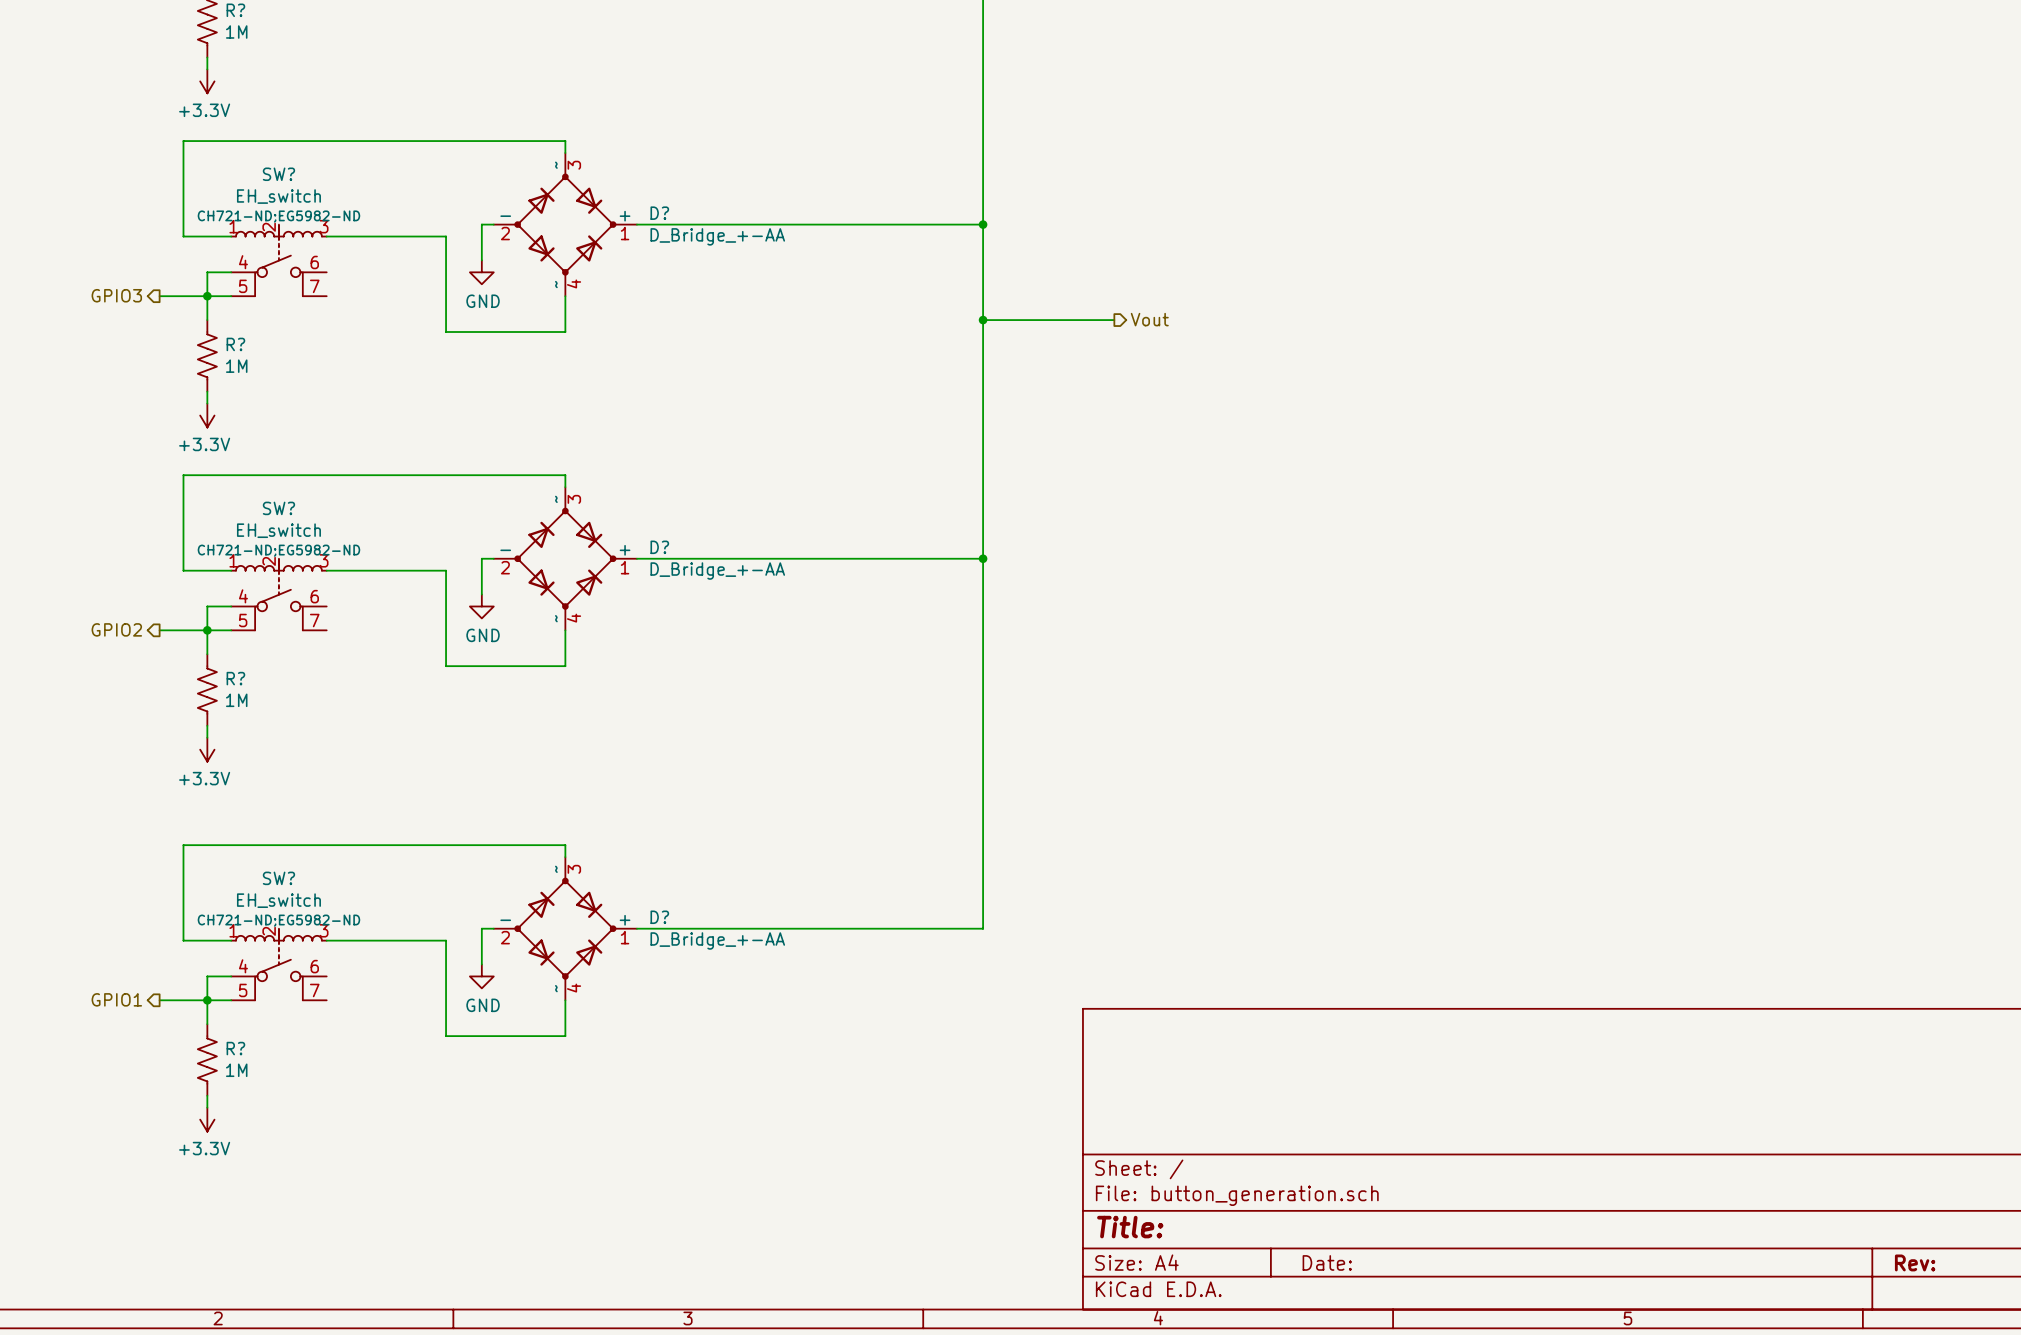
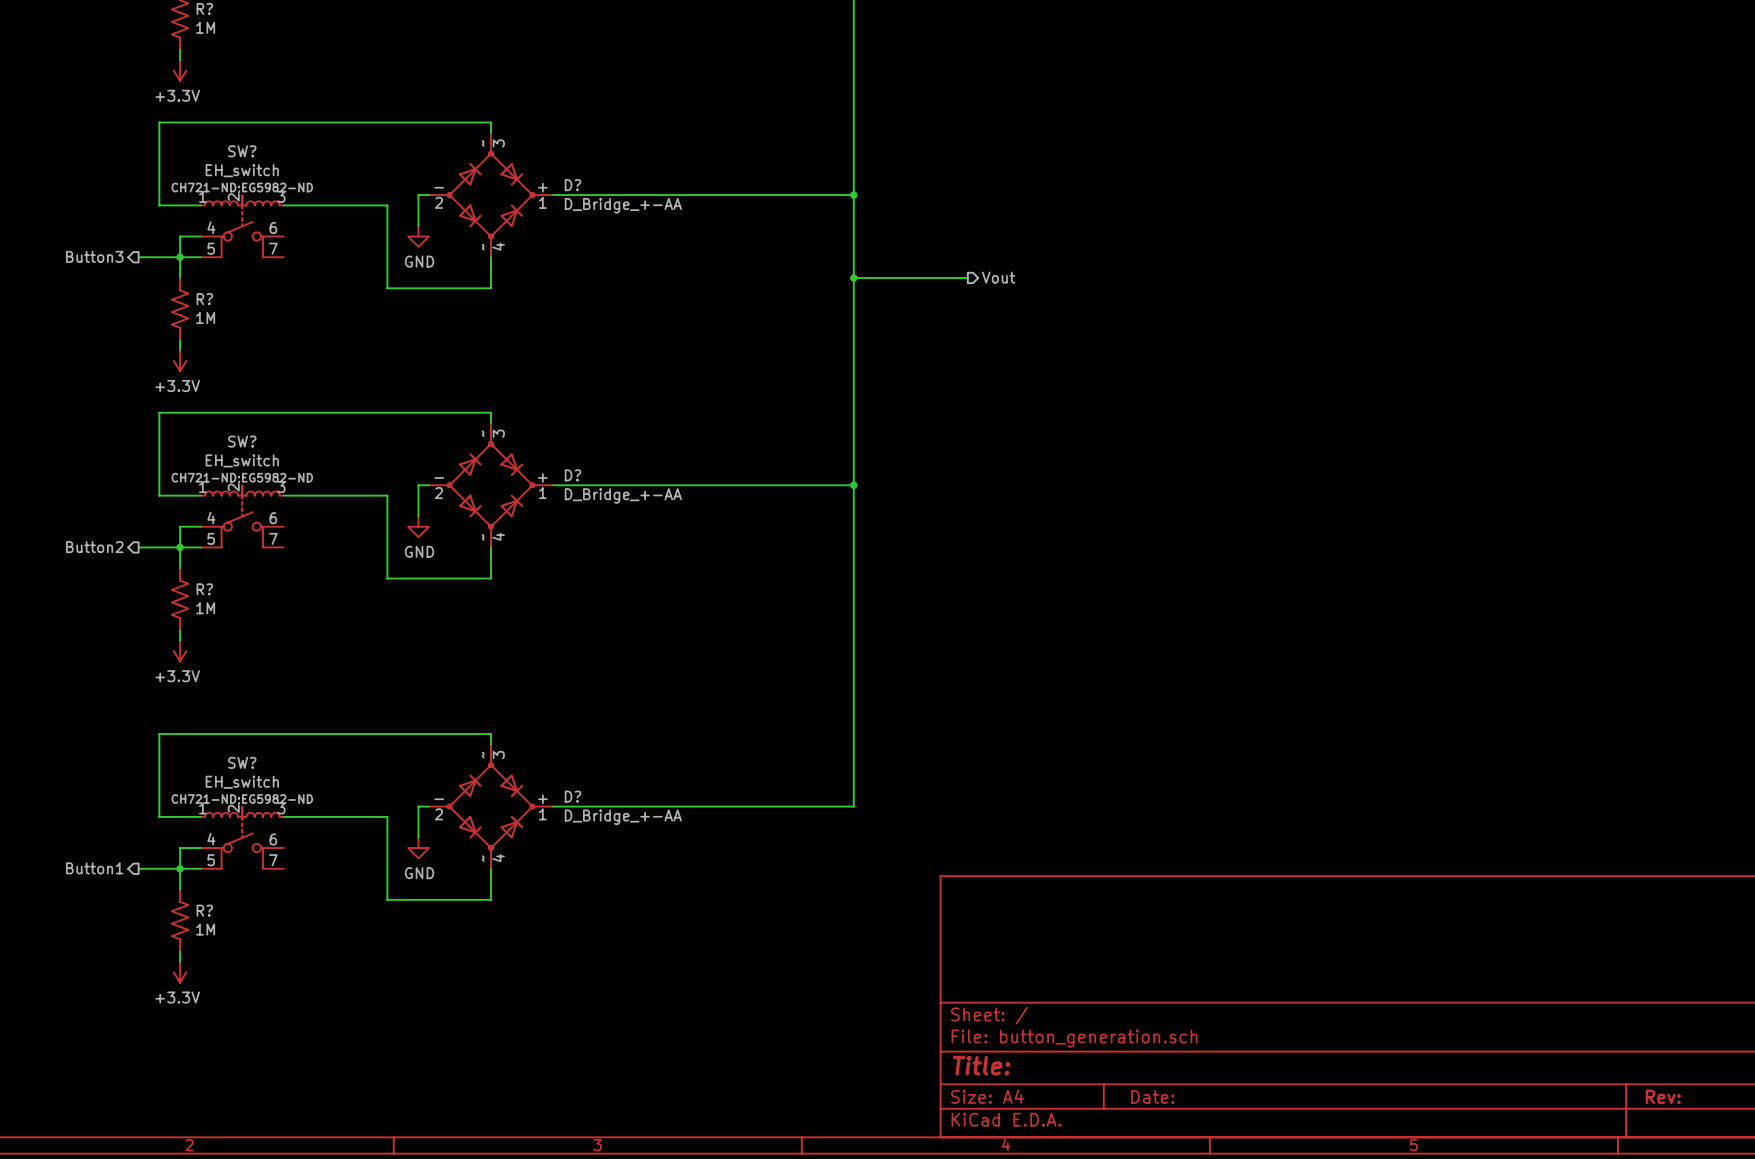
hierarchical label: GPIO3 (116, 295) -> Button3 (94, 256)
hierarchical label: GPIO2 (116, 629) -> Button2 (94, 547)
hierarchical label: GPIO1 (116, 999) -> Button1 (94, 868)

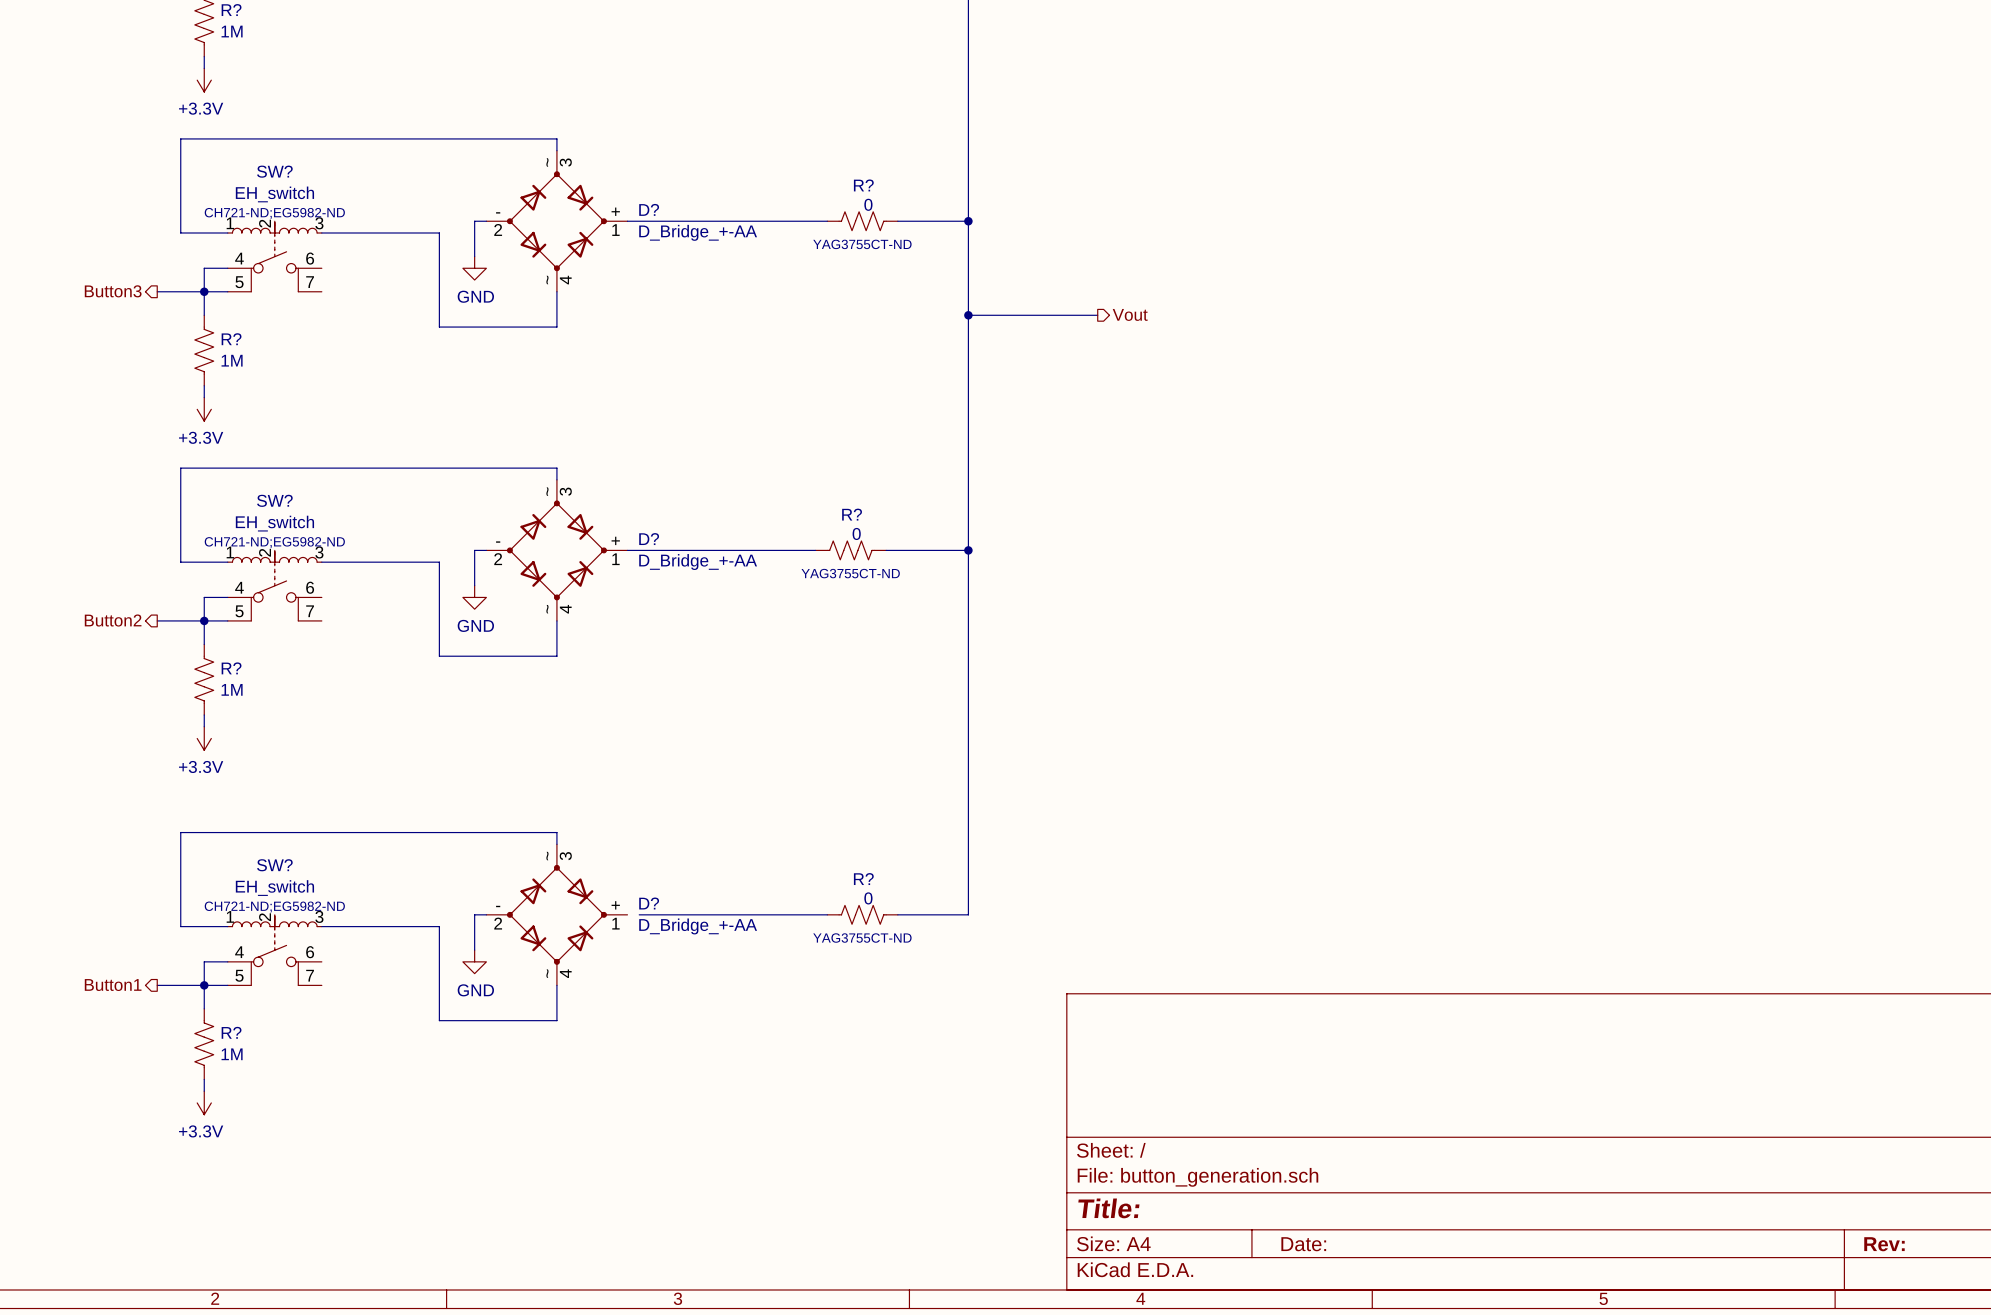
R?: none -> 0 (862, 221)
R?: none -> 0 (850, 550)
wire: (553, 806) (563, 806) -> none
R?: none -> 0 (862, 914)

